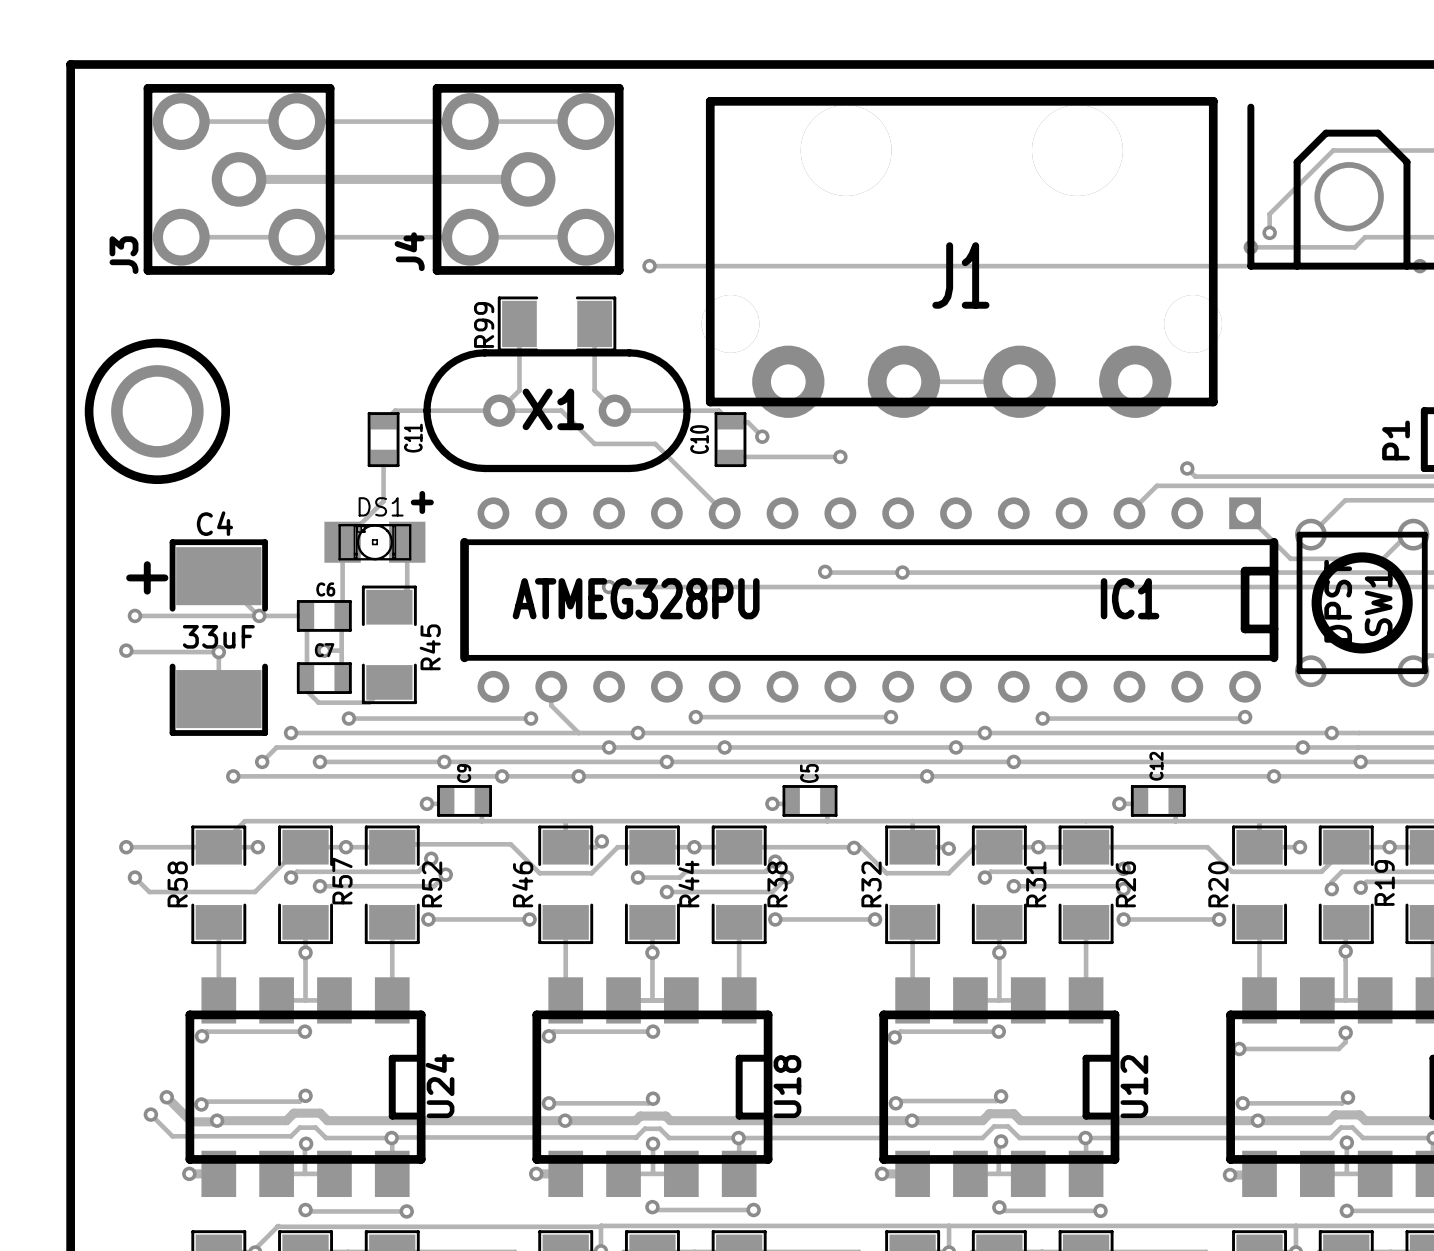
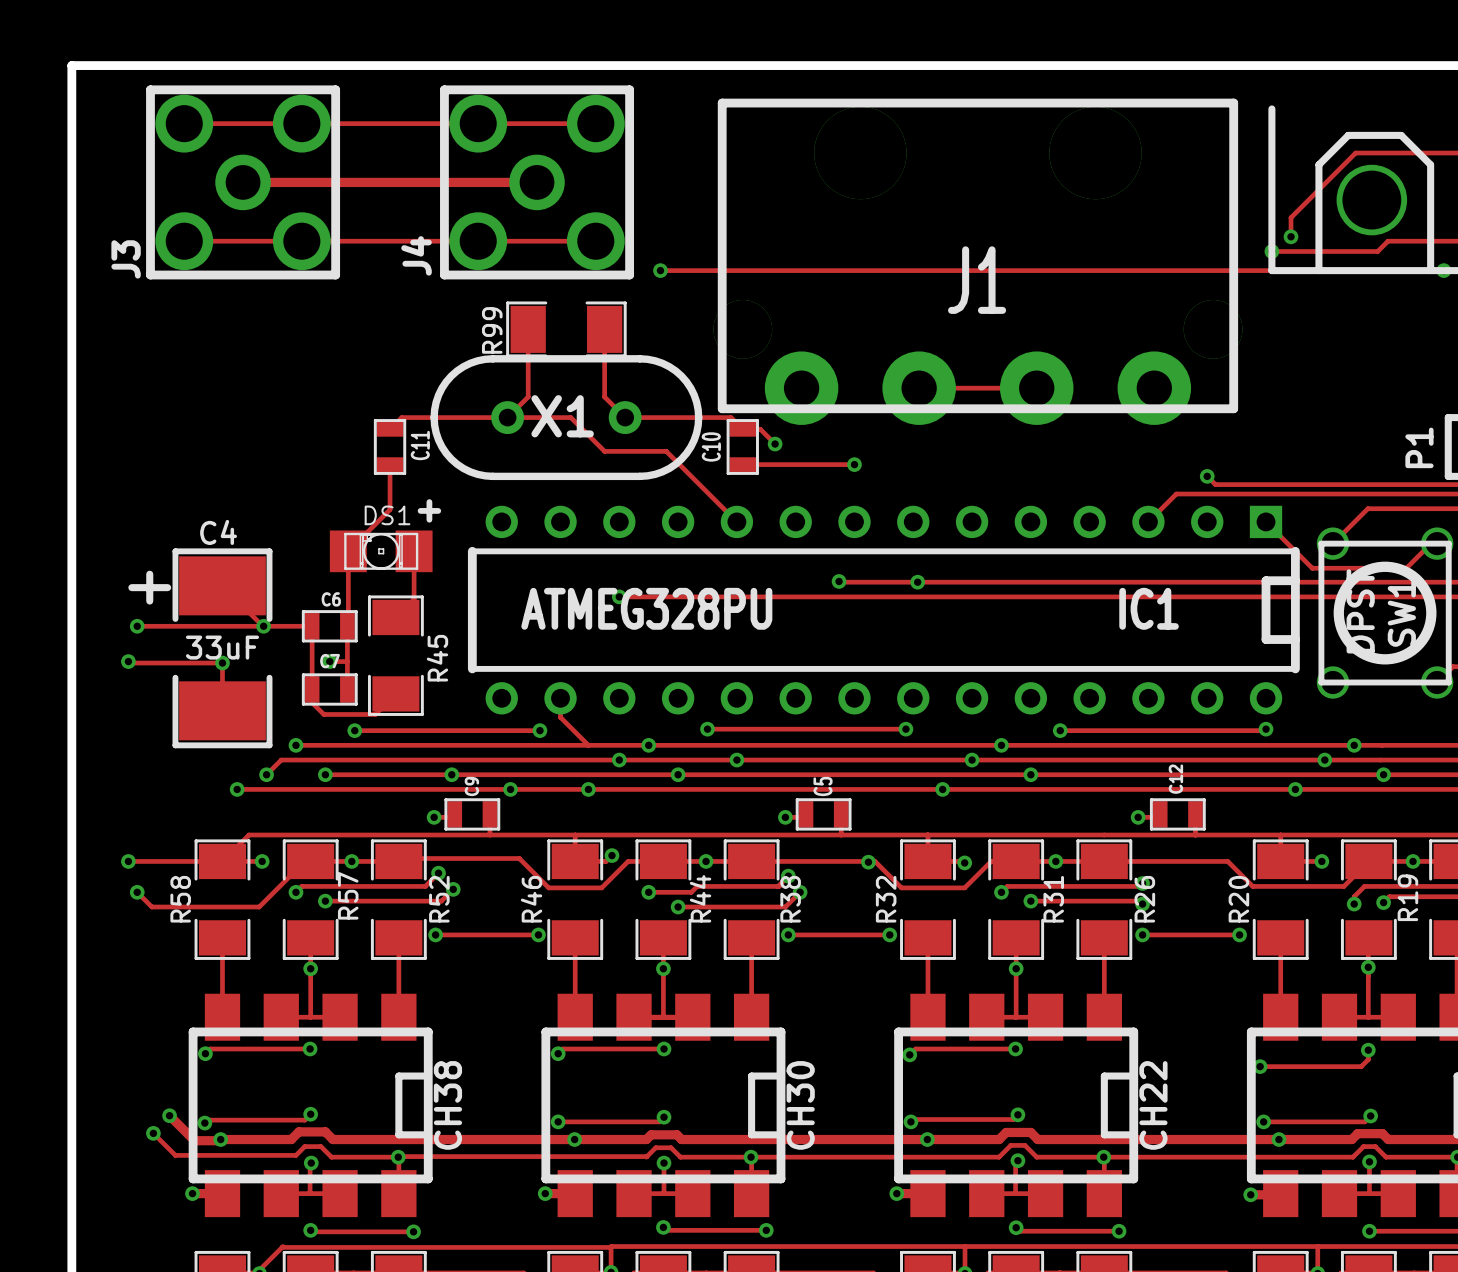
part: (157, 411) -> none
U24 name: U24 (439, 1086) -> CH38 (447, 1105)
U18 name: U18 (787, 1086) -> CH30 (800, 1105)
U12 name: U12 (1134, 1086) -> CH22 (1153, 1105)

